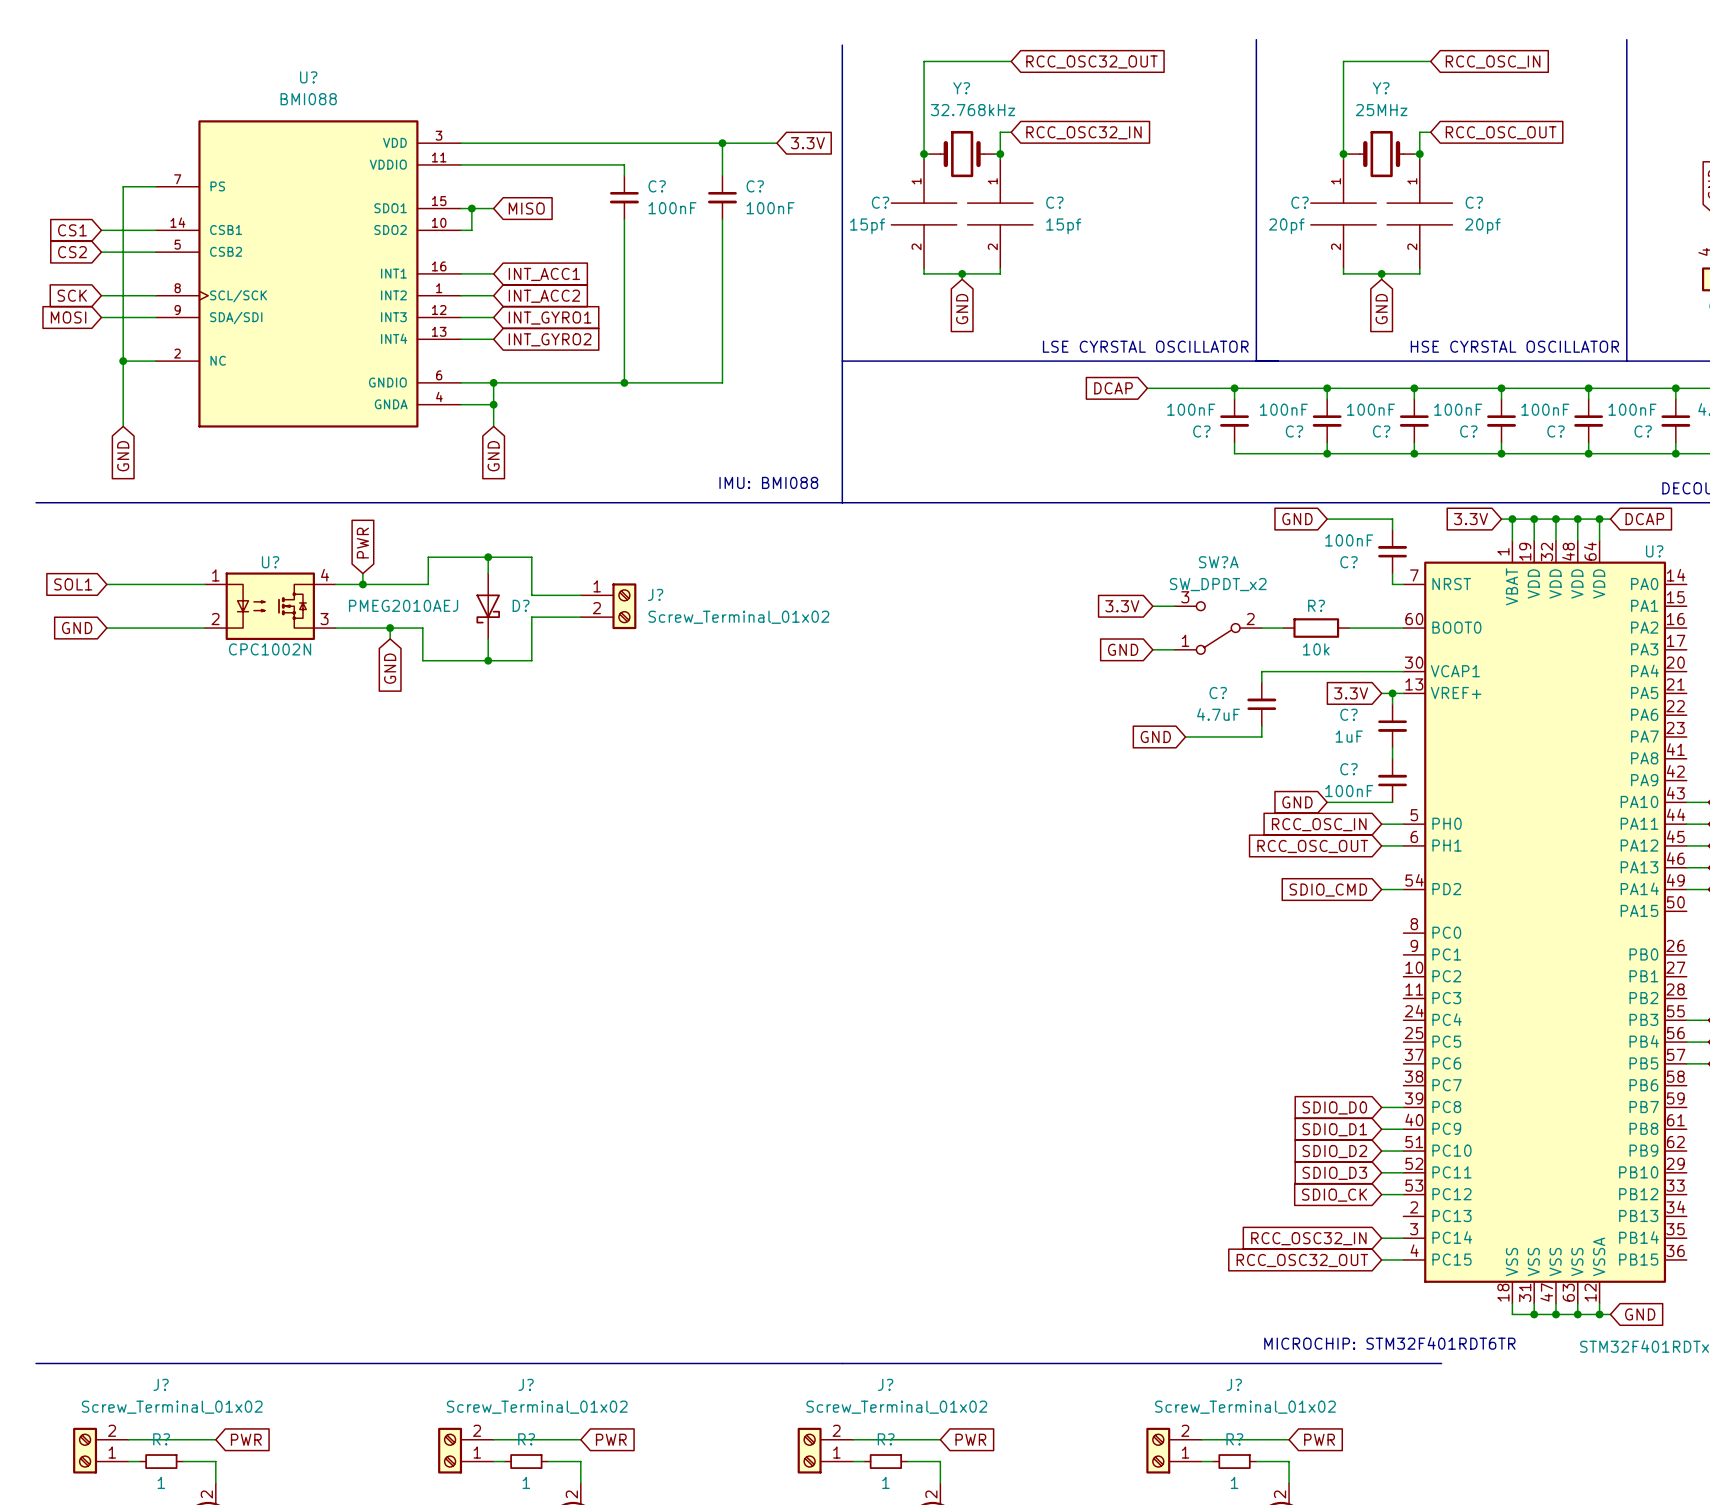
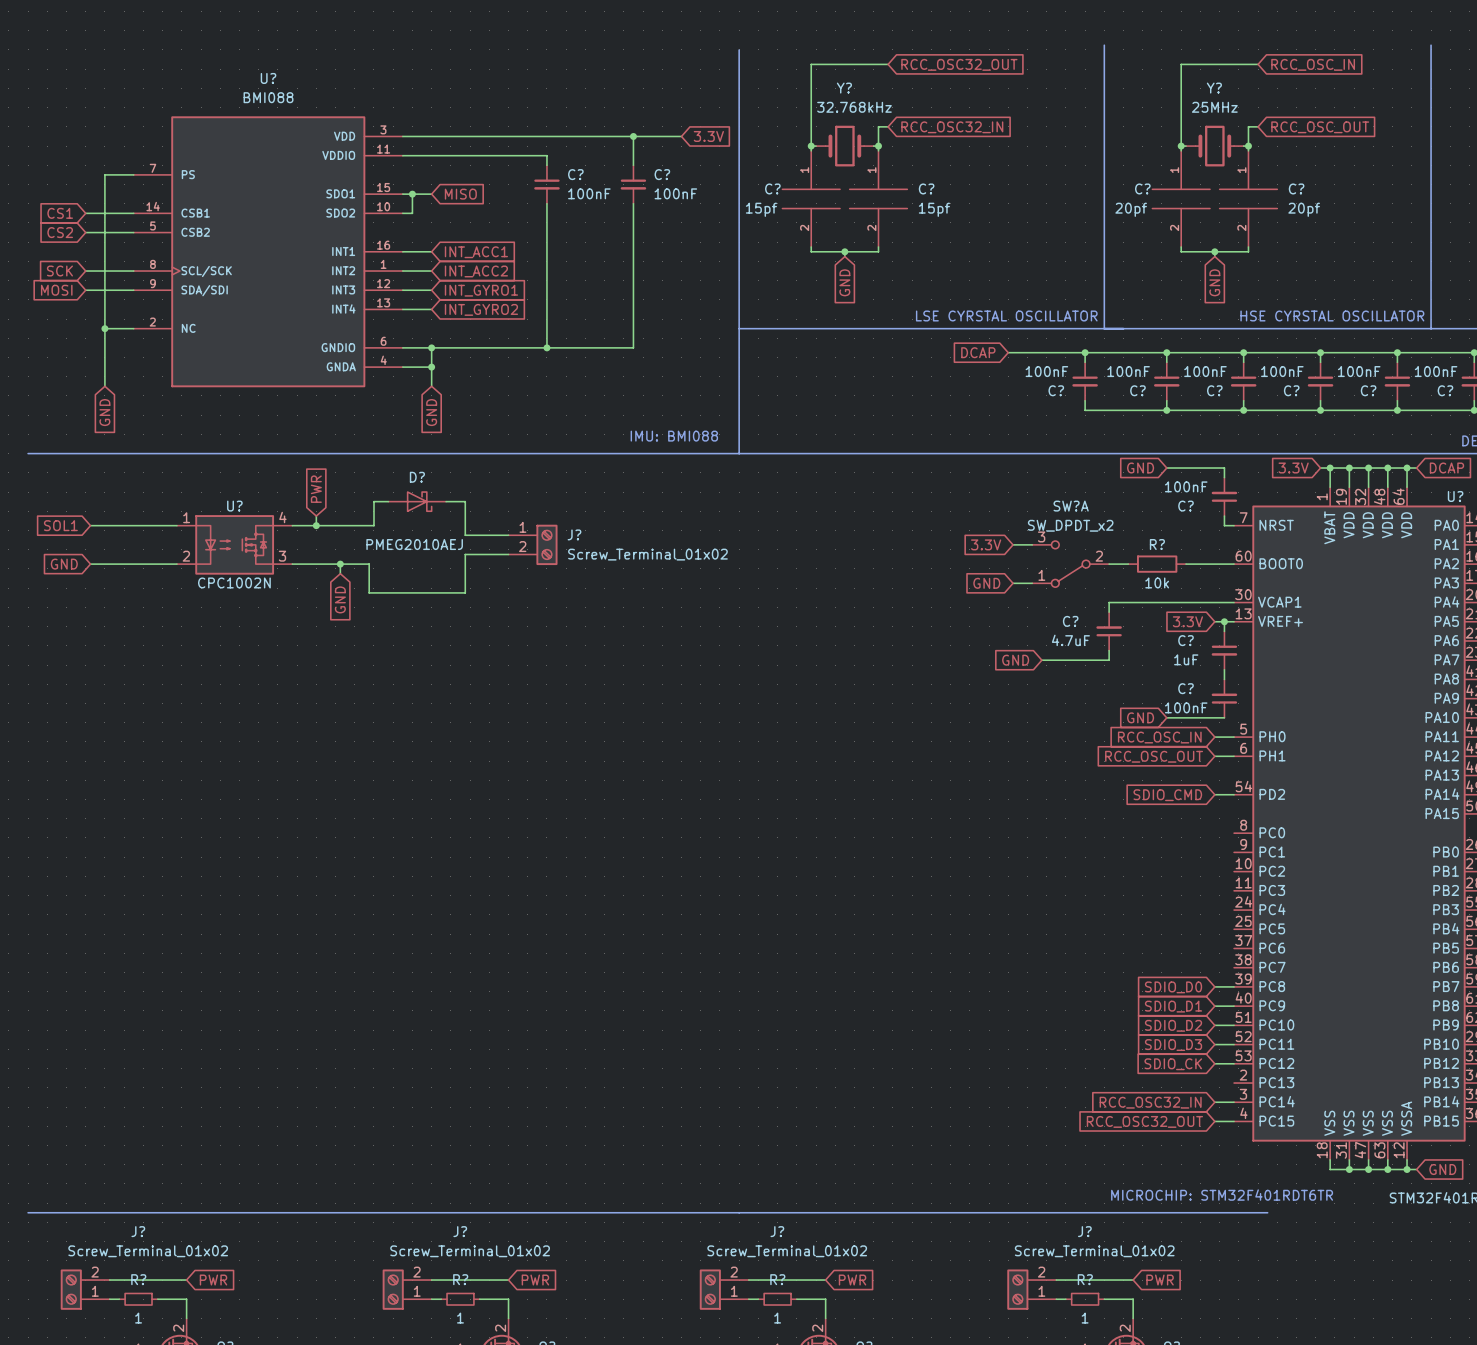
junction: (488, 557) -> none
D? value position: PMEG2010AEJ (403, 605) -> PMEG2010AEJ (414, 544)
D? position: (488, 606) -> (417, 501)
D? rotation: 0° (488, 608) -> 90° counterclockwise (419, 501)
wire: (488, 638) (488, 660) -> none
junction: (488, 660) -> none

